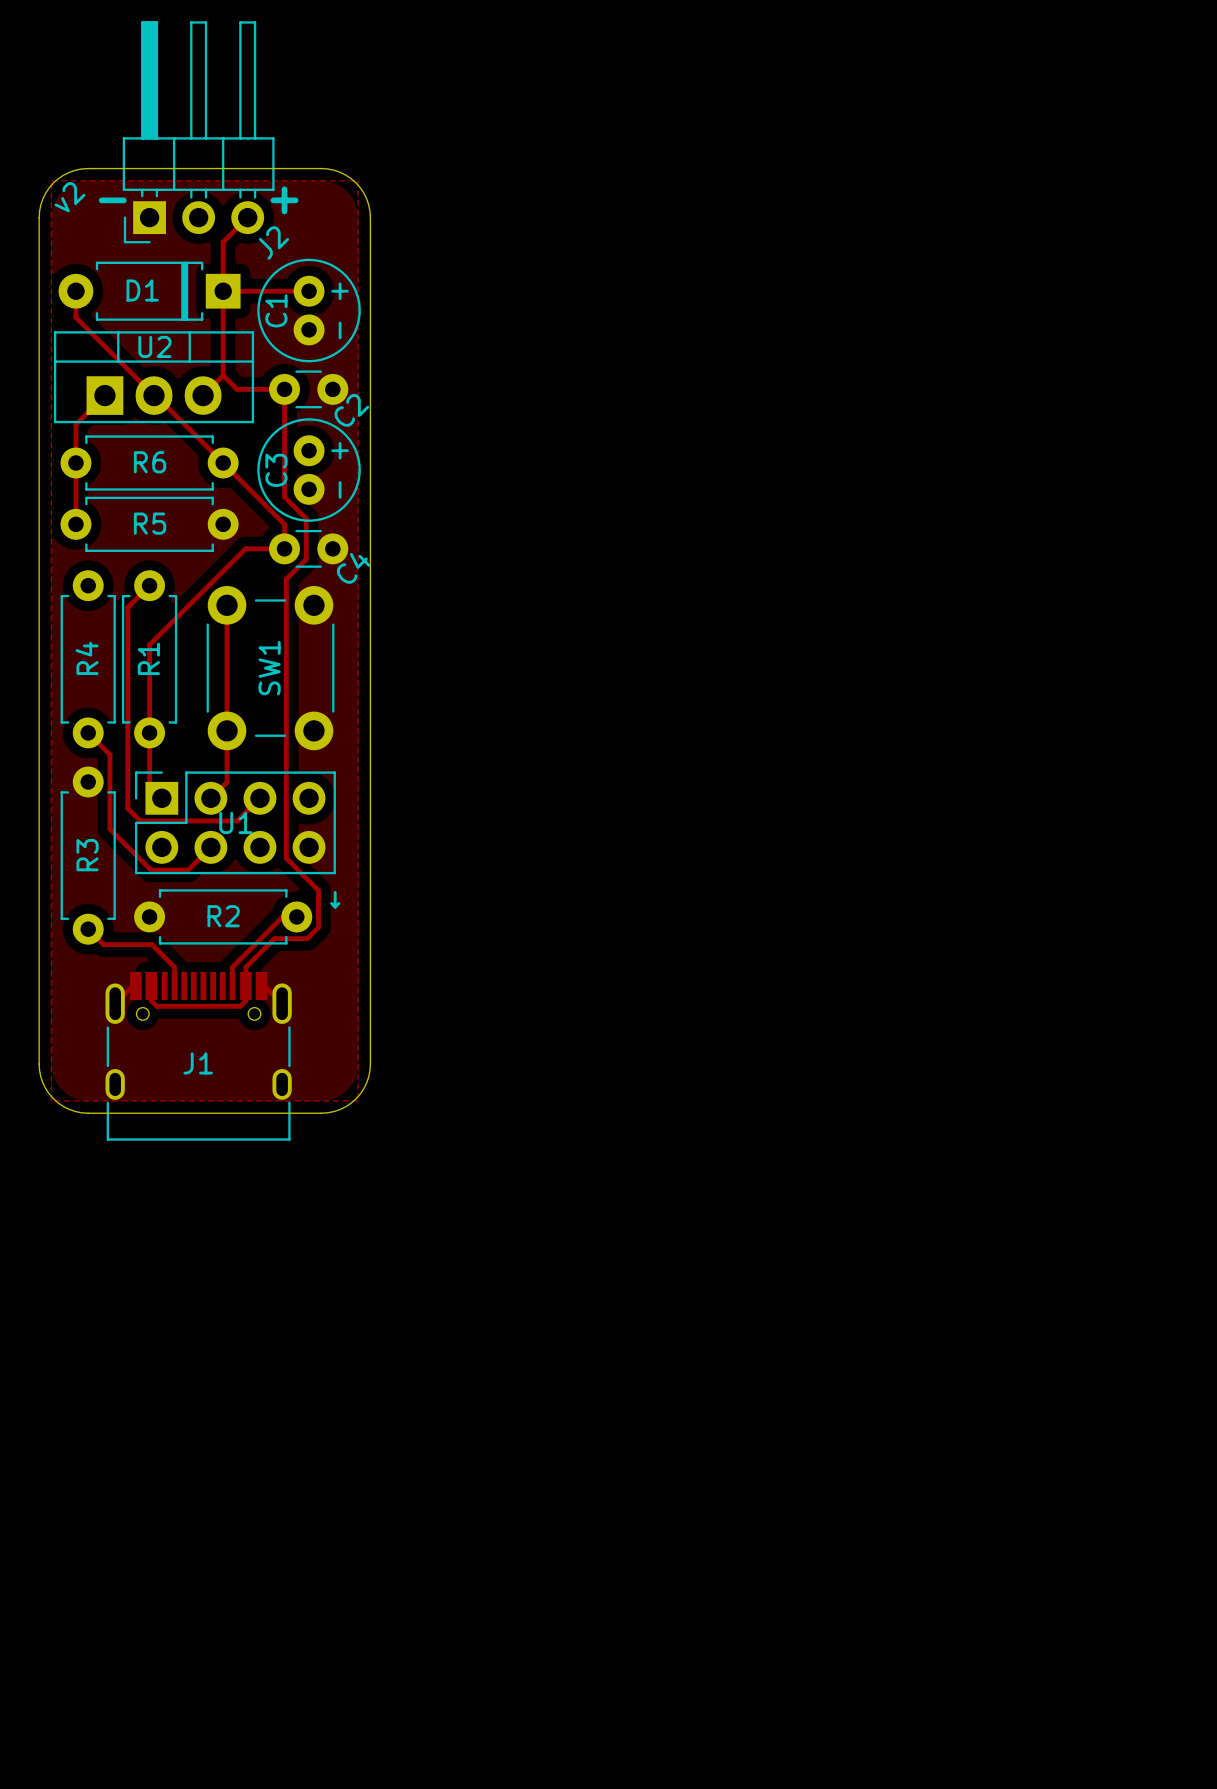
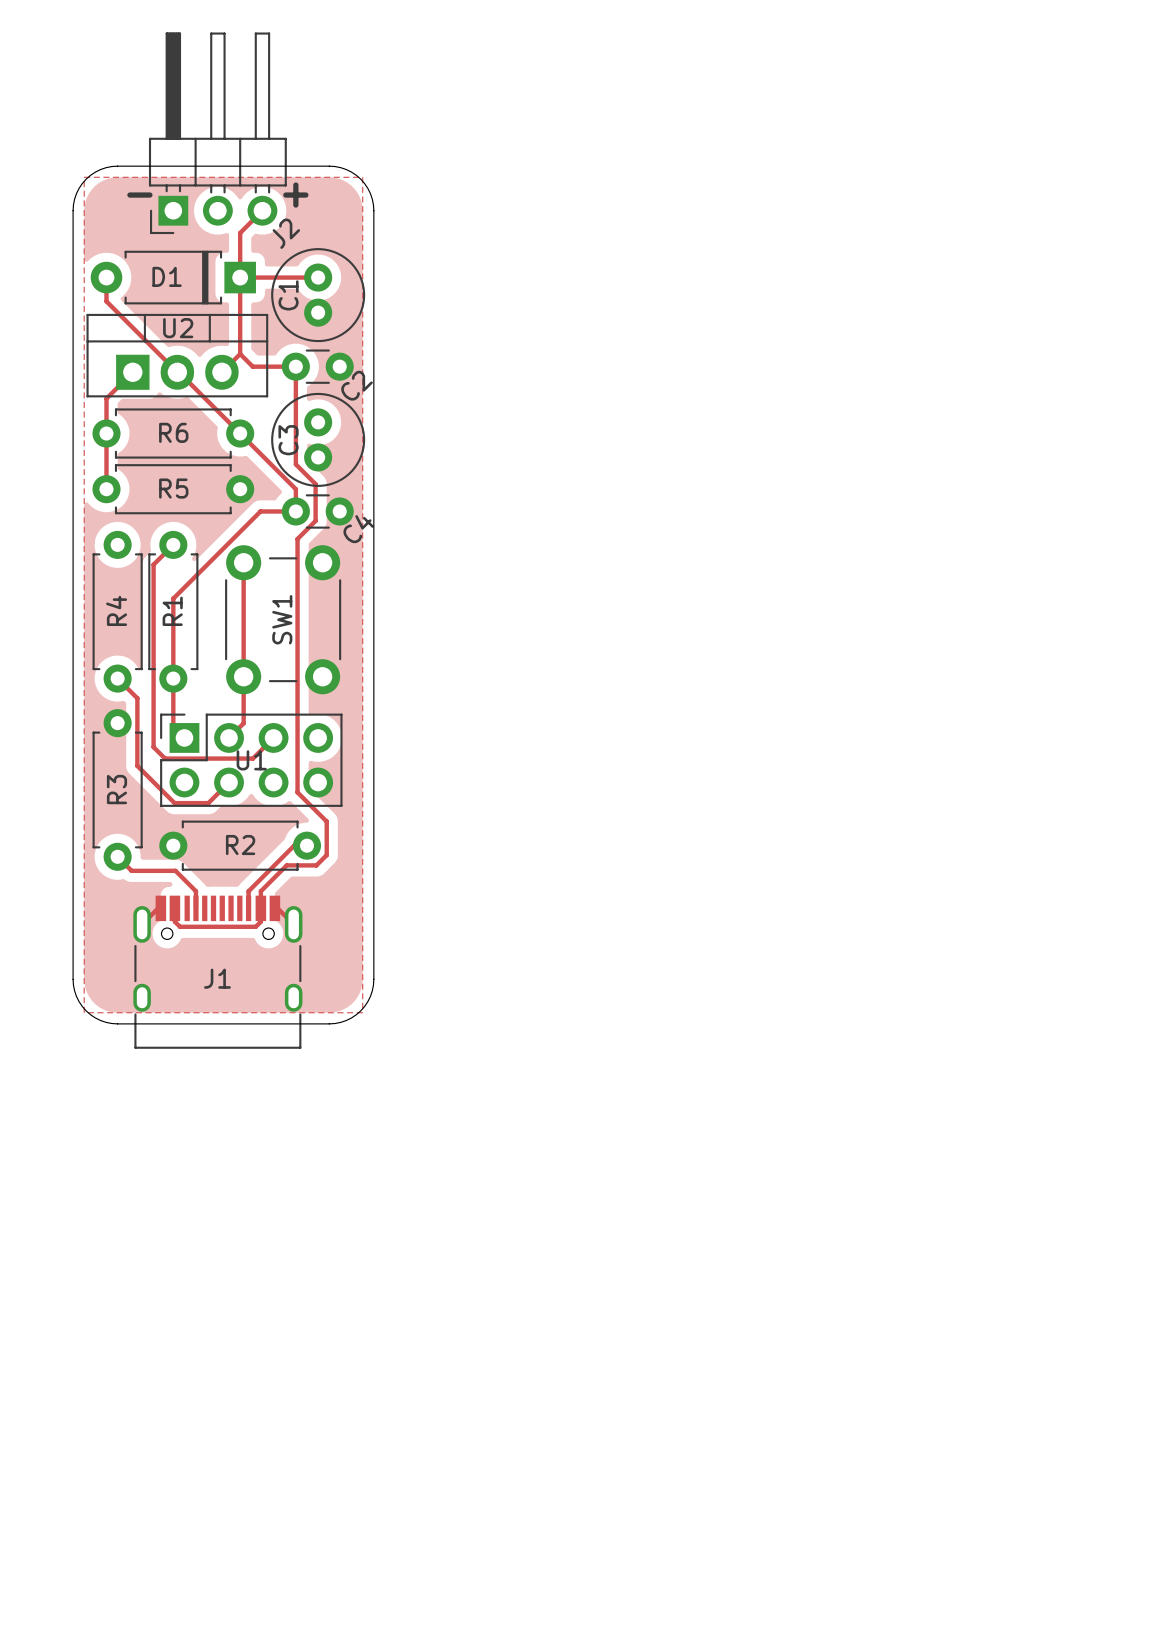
text: v2 (70, 197) -> none
text: + (340, 291) -> none
text: - (340, 330) -> none
text: + (340, 450) -> none
text: - (340, 489) -> none
text: ← (335, 899) -> none

